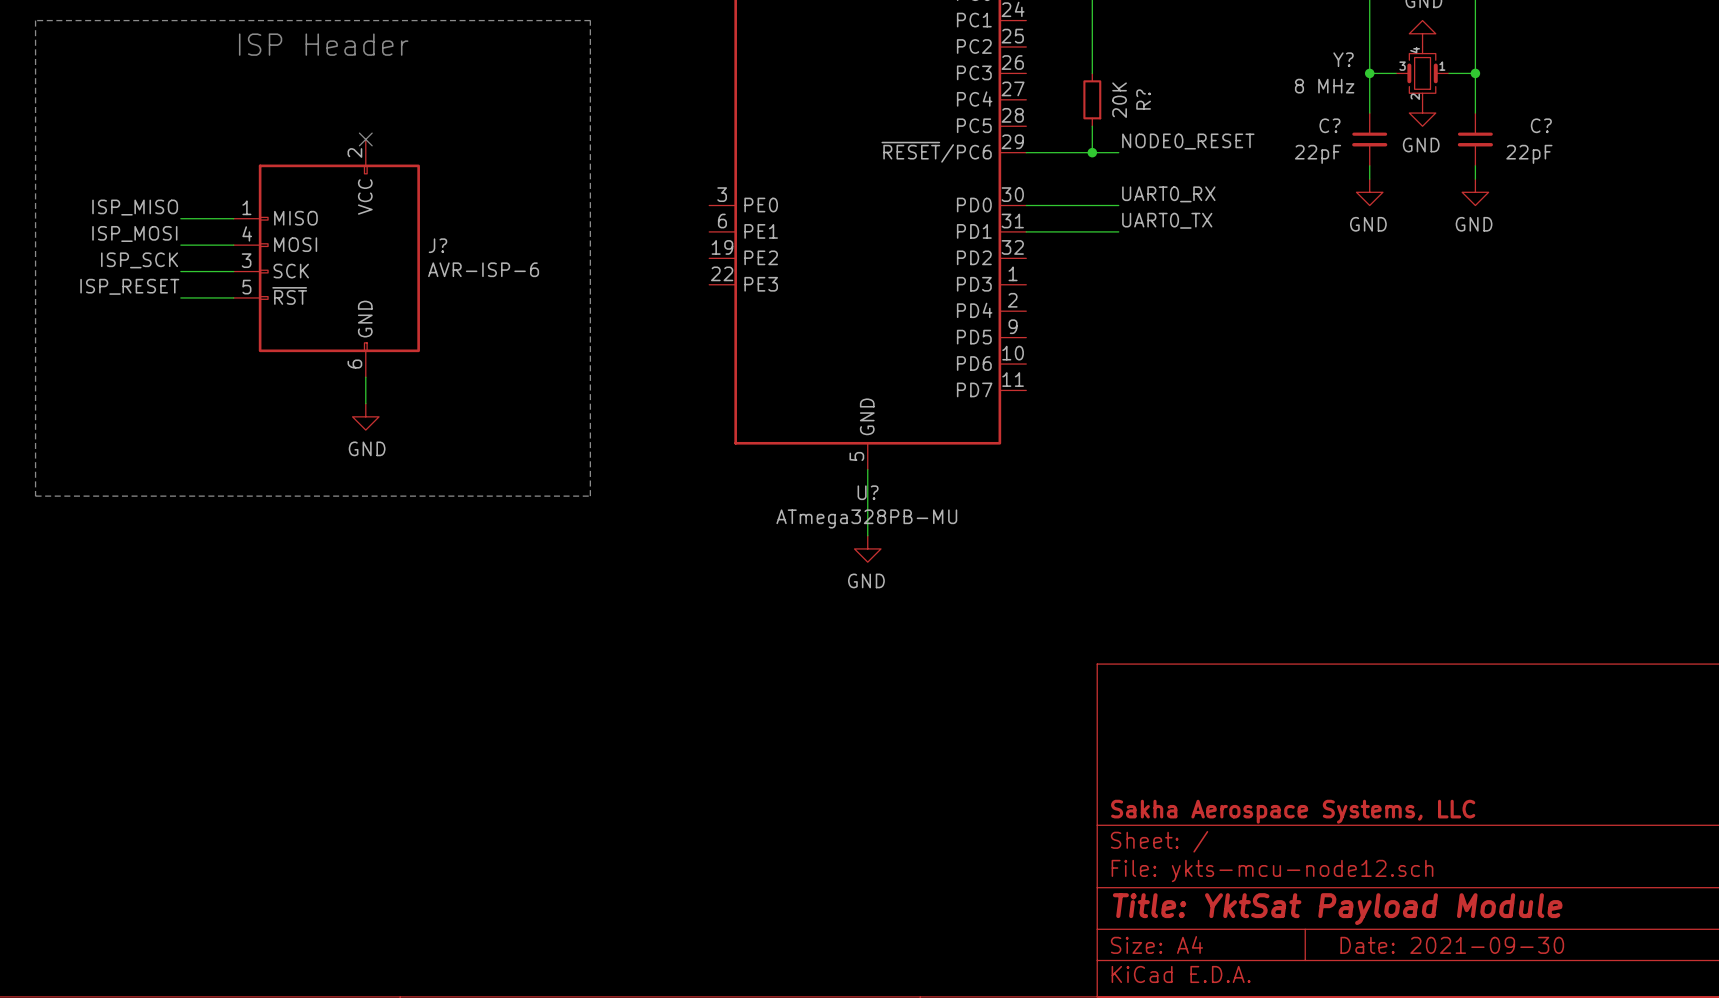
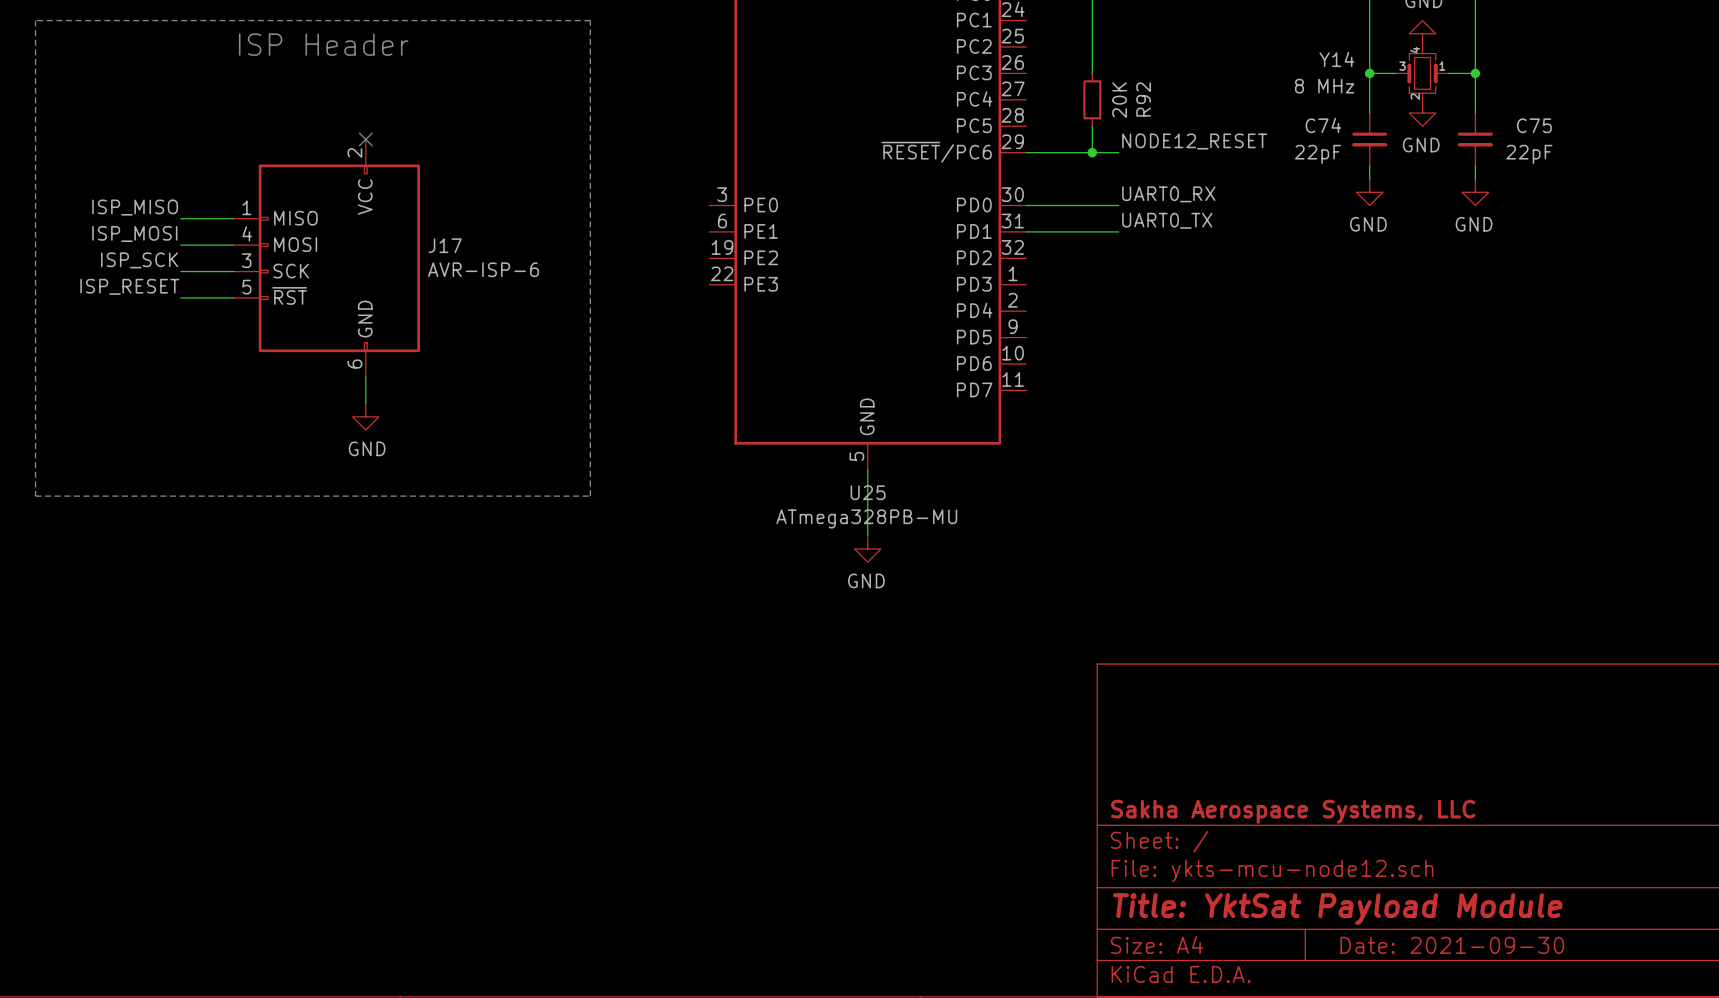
Y? name: Y? (1343, 59) -> Y14 (1336, 59)
R? name: R? (1143, 99) -> R92 (1143, 99)
C? name: C? (1329, 125) -> C74 (1323, 125)
C? name: C? (1541, 125) -> C75 (1534, 125)
label: NODE0_RESET (1188, 141) -> NODE12_RESET (1194, 141)
J? name: J? (437, 245) -> J17 (445, 245)
U? name: U? (868, 492) -> U25 (868, 492)

